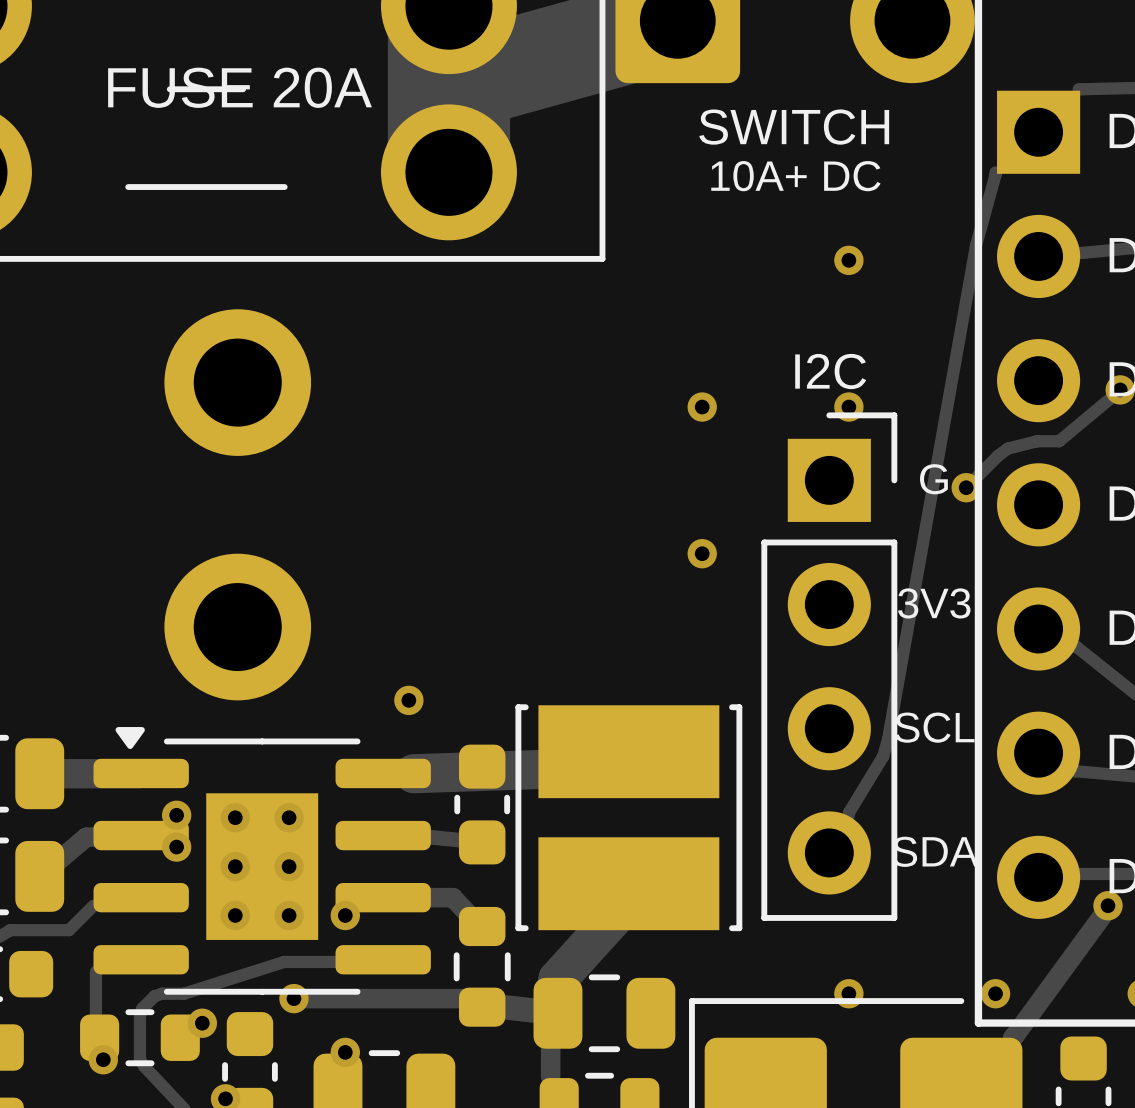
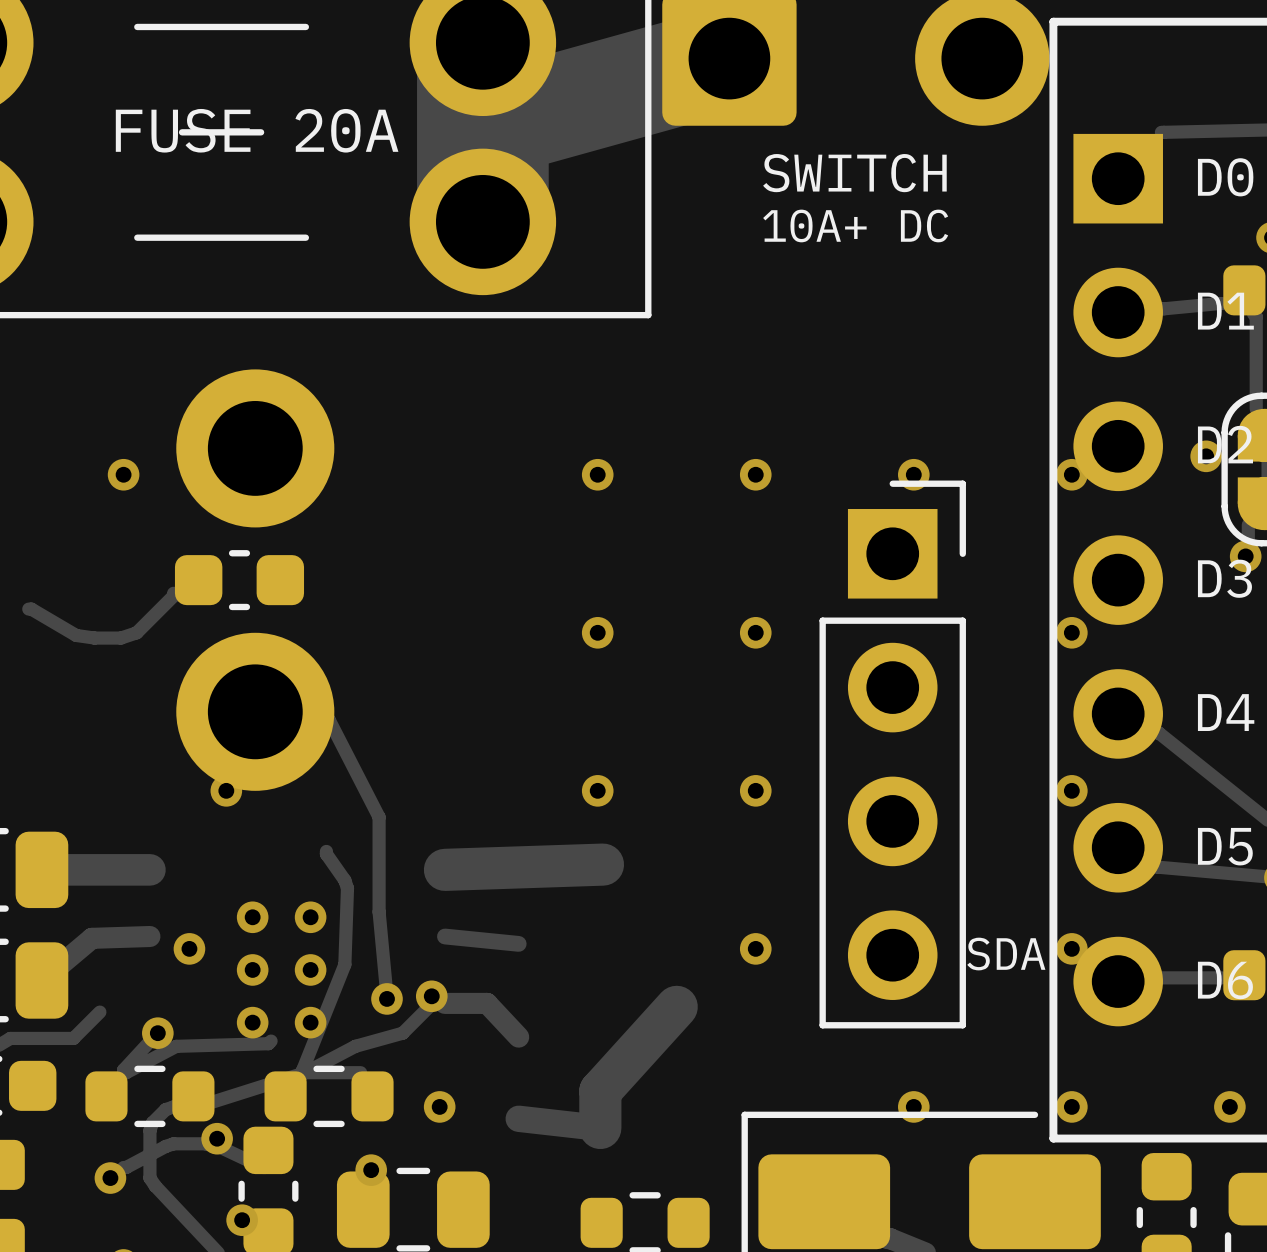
track: (995, 172) (976, 245) (888, 739) (883, 756) (848, 815) -> none
via: (848, 260) -> none
text: I2C (830, 371) -> none
track: (1120, 389) (1059, 441) (1037, 441) (1007, 448) (966, 487) -> none
via: none -> (123, 474)
via: none -> (597, 474)
via: none -> (1071, 474)
text: G (933, 479) -> none
via: (966, 487) -> none
part: none -> (239, 580)
track: none -> (173, 593) (173, 595) (136, 632) (120, 638) (94, 638) (76, 635) (28, 609)
via: none -> (597, 632)
via: none -> (1071, 632)
text: 3V3 (934, 603) -> none
track: none -> (326, 717) (379, 817) (379, 912) (387, 998)
via: none -> (226, 790)
via: (408, 700) -> none
via: none -> (597, 790)
via: none -> (755, 790)
via: none -> (1071, 790)
text: SCL (934, 727) -> none
track: none -> (326, 851) (344, 880) (347, 888) (344, 964) (302, 1072) (355, 1046) (402, 1033) (431, 1004) (431, 996)
part: (482, 804) -> none
via: (176, 815) -> none
part: (628, 817) -> none
via: none -> (755, 948)
via: none -> (1071, 948)
part: (262, 860) -> none
via: none -> (431, 996)
track: (1108, 905) (1012, 1037) -> none
via: (1108, 905) -> none
via position: (345, 915) -> (387, 998)
track: none -> (157, 1033) (123, 1070) (123, 1072) (176, 1046) (268, 1043) (271, 1041)
via: none -> (157, 1033)
part: (482, 966) -> none
track: (95, 971) (95, 1013) -> none
part: none -> (329, 1096)
via: none -> (439, 1106)
track: (293, 998) (469, 998) -> none
via: (293, 998) -> none
part: (604, 1013) -> none
track: (550, 1030) (550, 1076) -> none
part position: (139, 1037) -> (149, 1096)
track: none -> (123, 1167) (173, 1143) (205, 1143) (218, 1146) (265, 1167)

